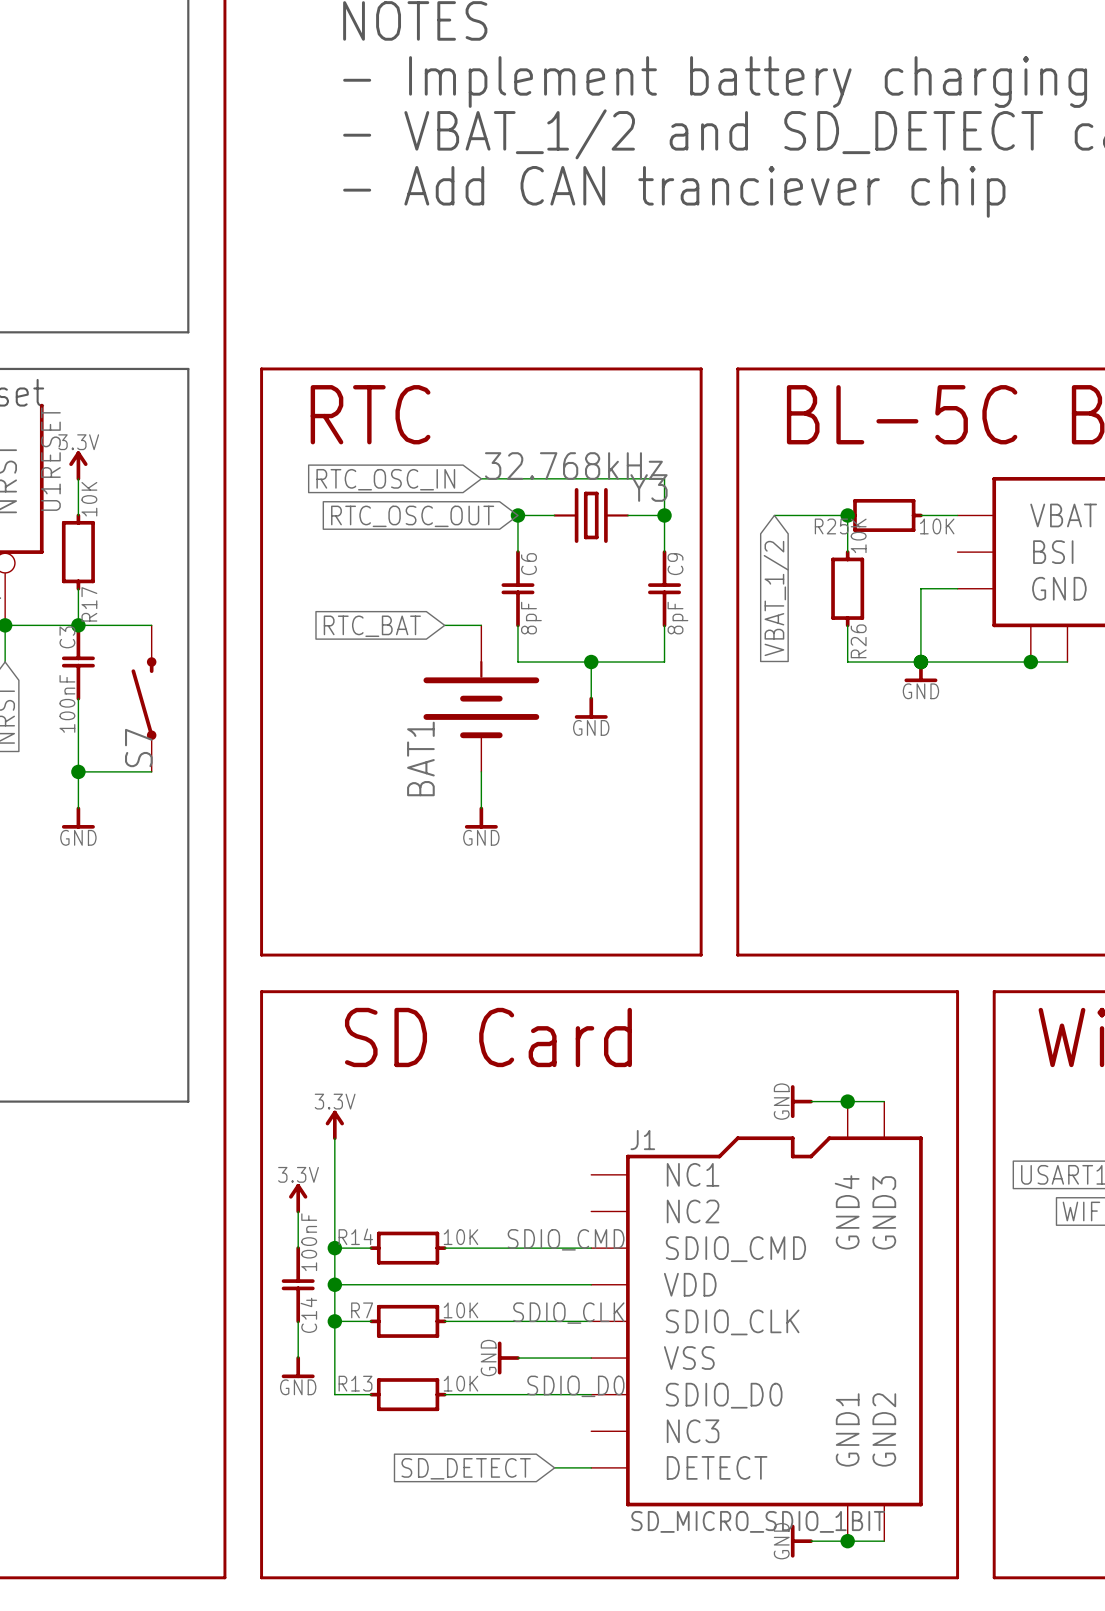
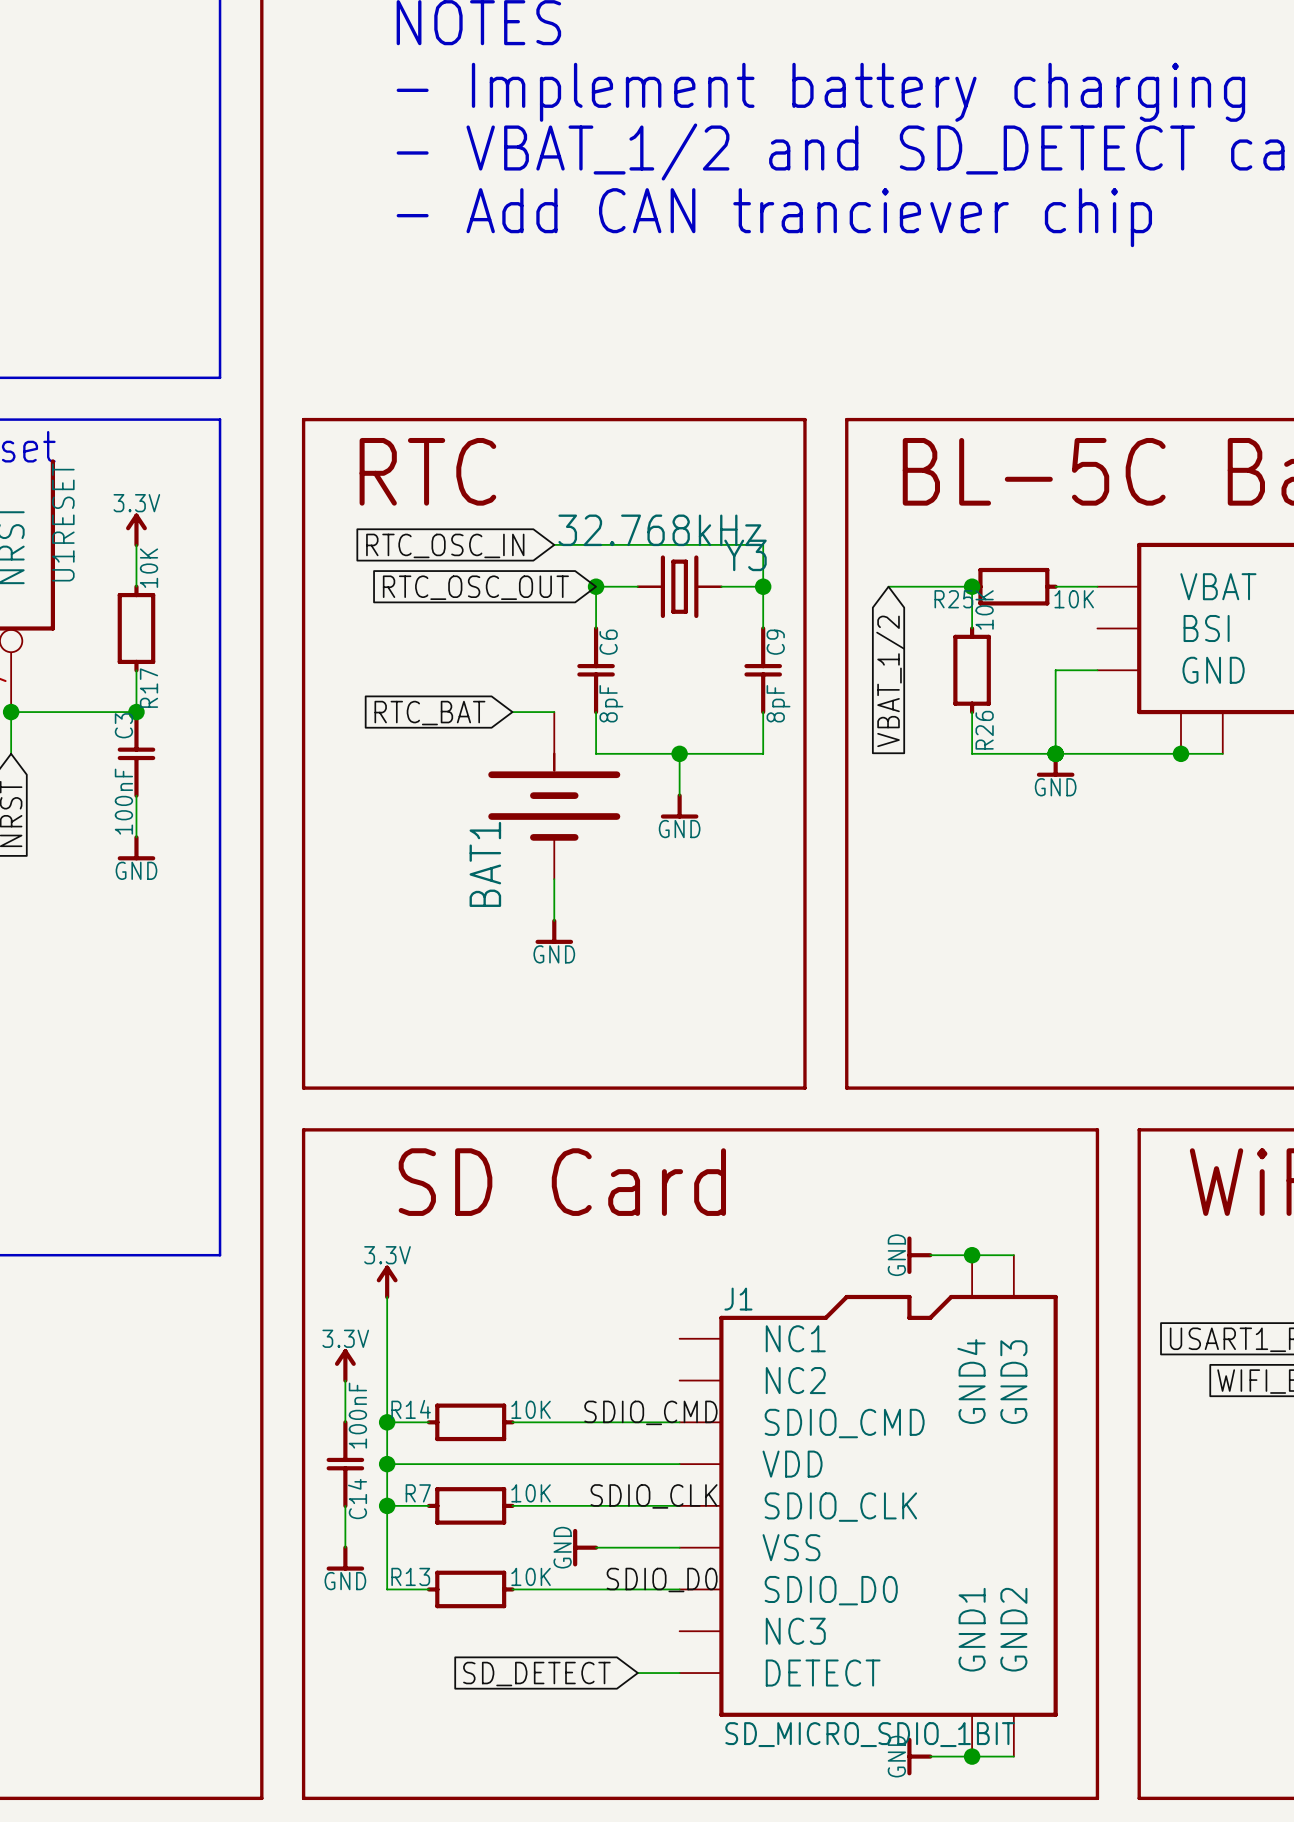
power symbol position: 3.3V (78, 466) -> 3.3V (136, 530)
wire: (78, 478) (78, 515) -> (136, 544) (136, 586)
R17 position: (78, 552) -> (136, 628)
wire: (78, 588) (78, 625) -> (136, 795) (136, 837)
junction position: (78, 625) -> (136, 712)
wire: (115, 625) (151, 625) -> (136, 712) (136, 670)
C3 position: (78, 662) -> (136, 753)
wire: (78, 698) (78, 808) -> none
S7: (143, 698) -> none
wire: (78, 771) (151, 771) -> none
junction: (78, 771) -> none
power symbol position: GND (78, 817) -> GND (136, 847)

